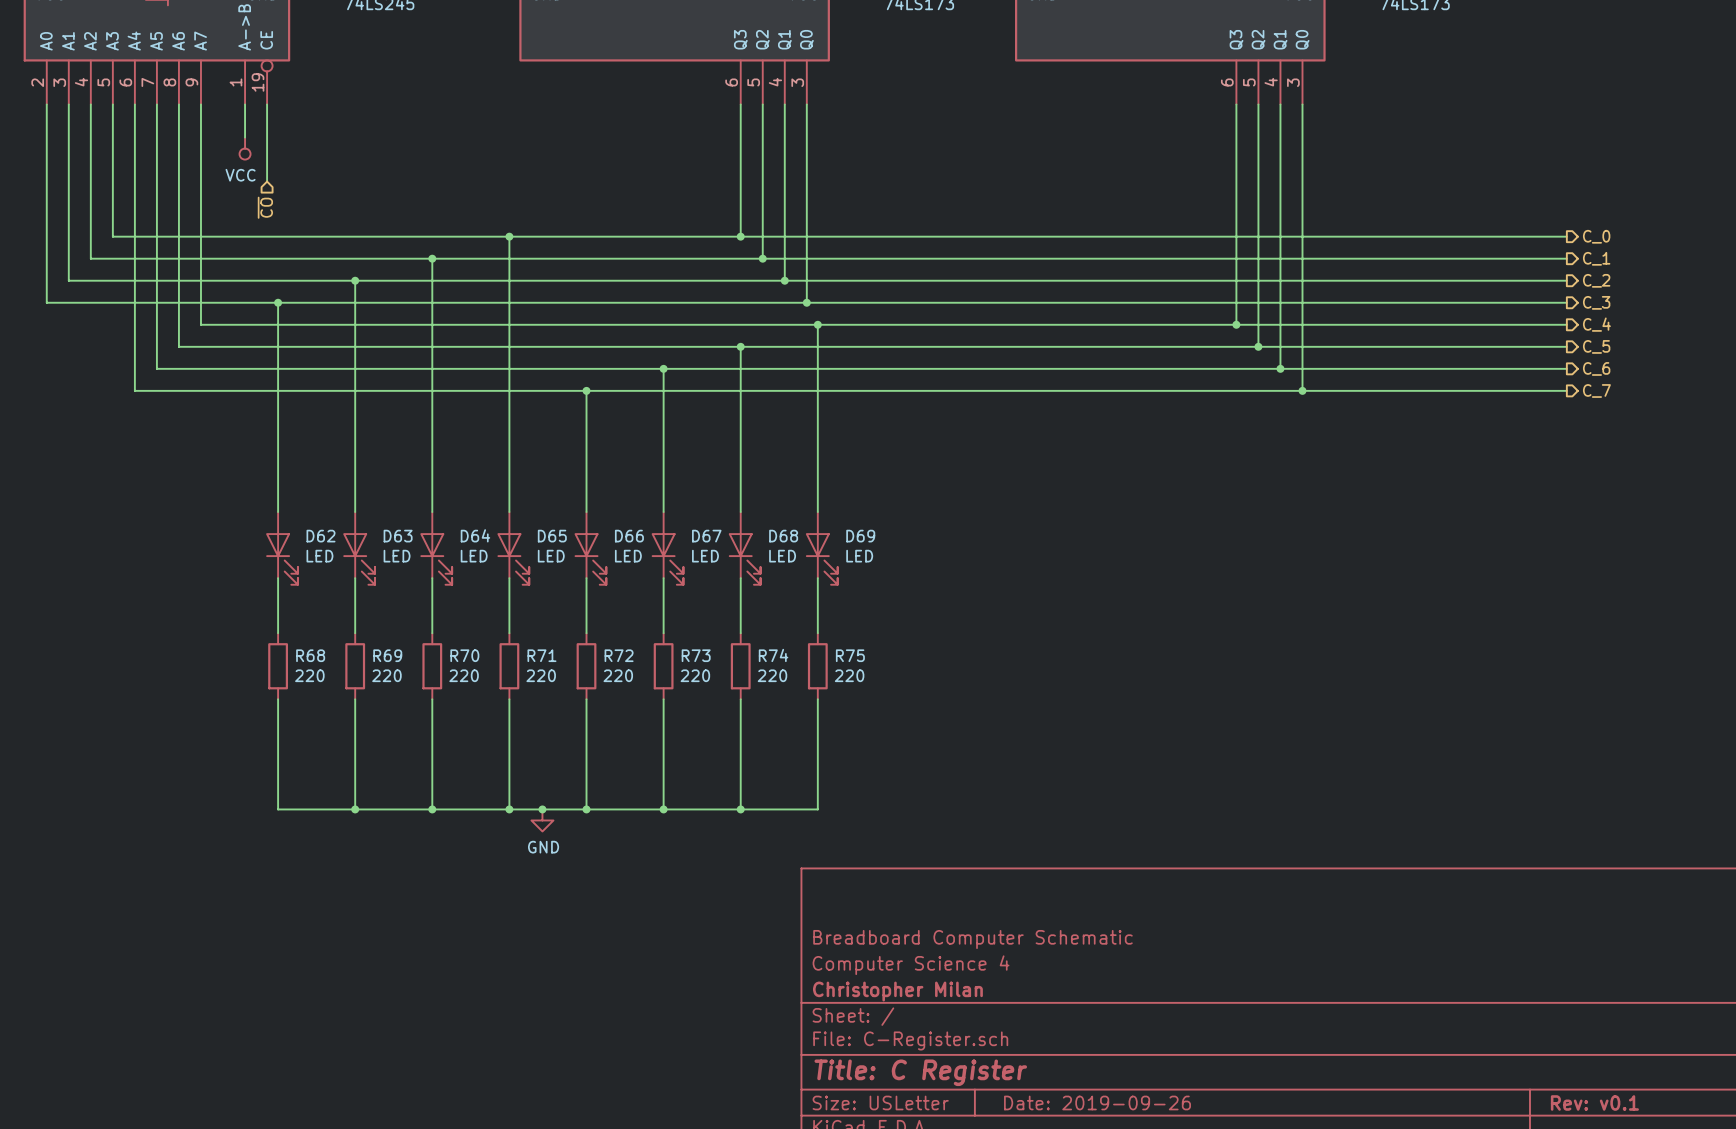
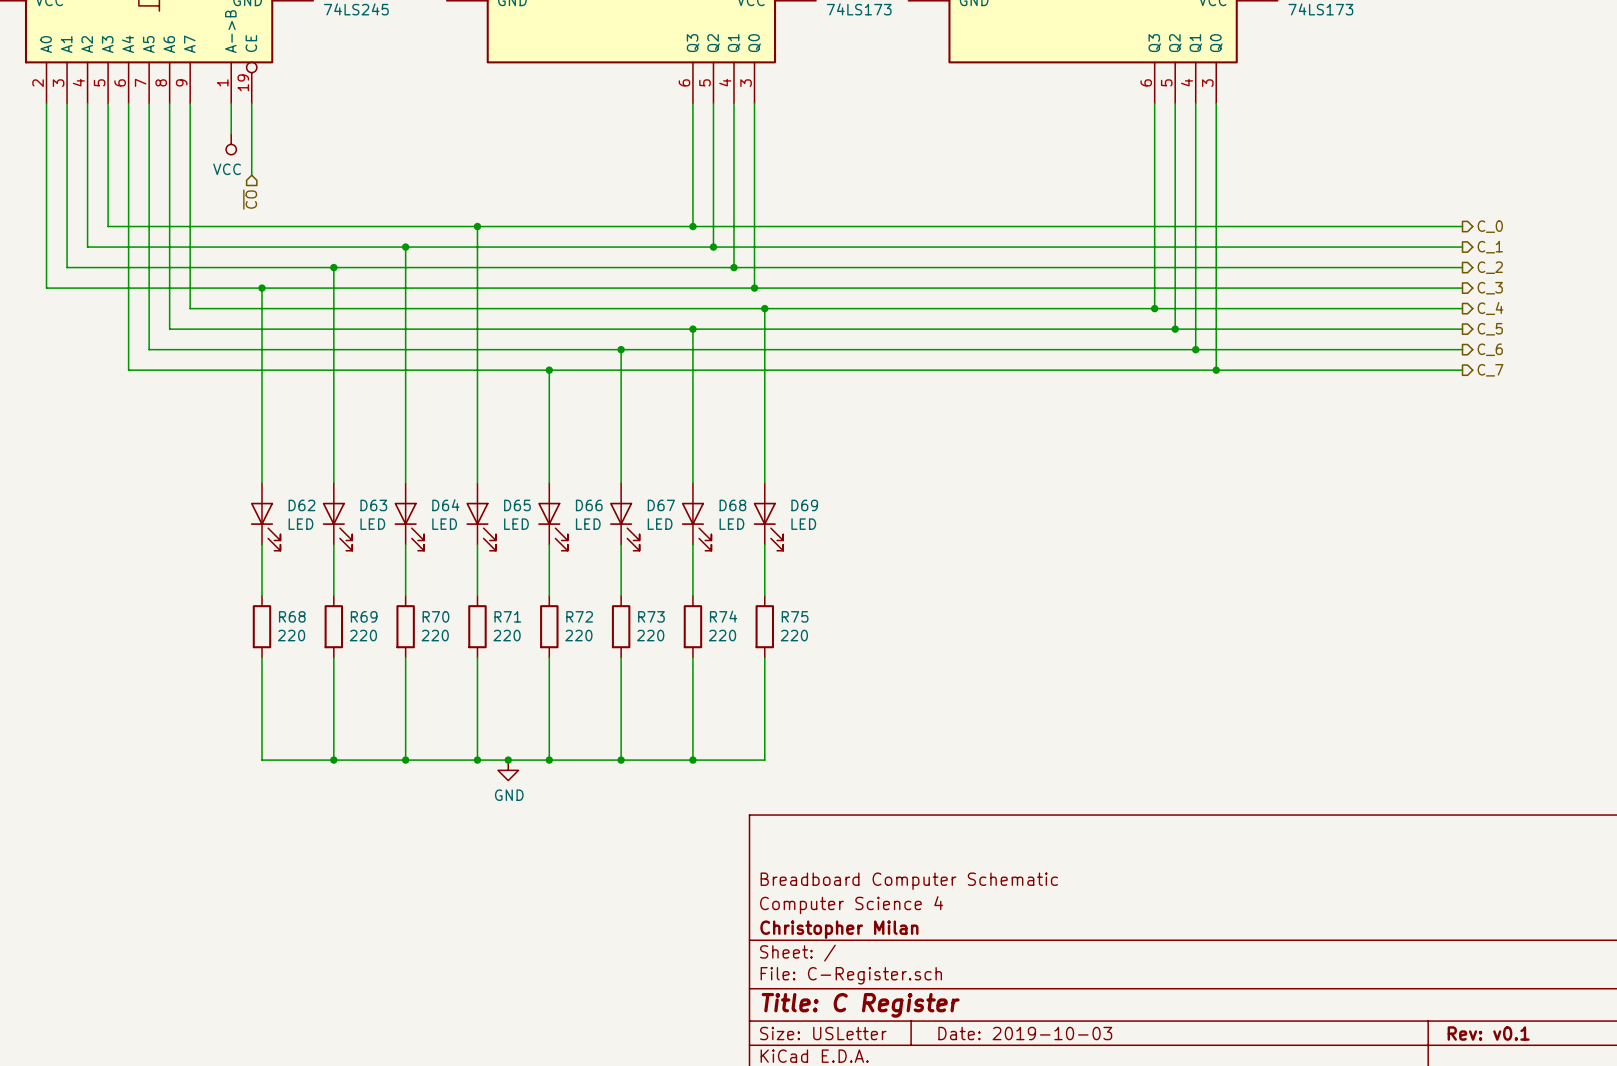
title block: Date: 2019-09-26 (1097, 1102) -> Date: 2019-10-03 (1025, 1033)

